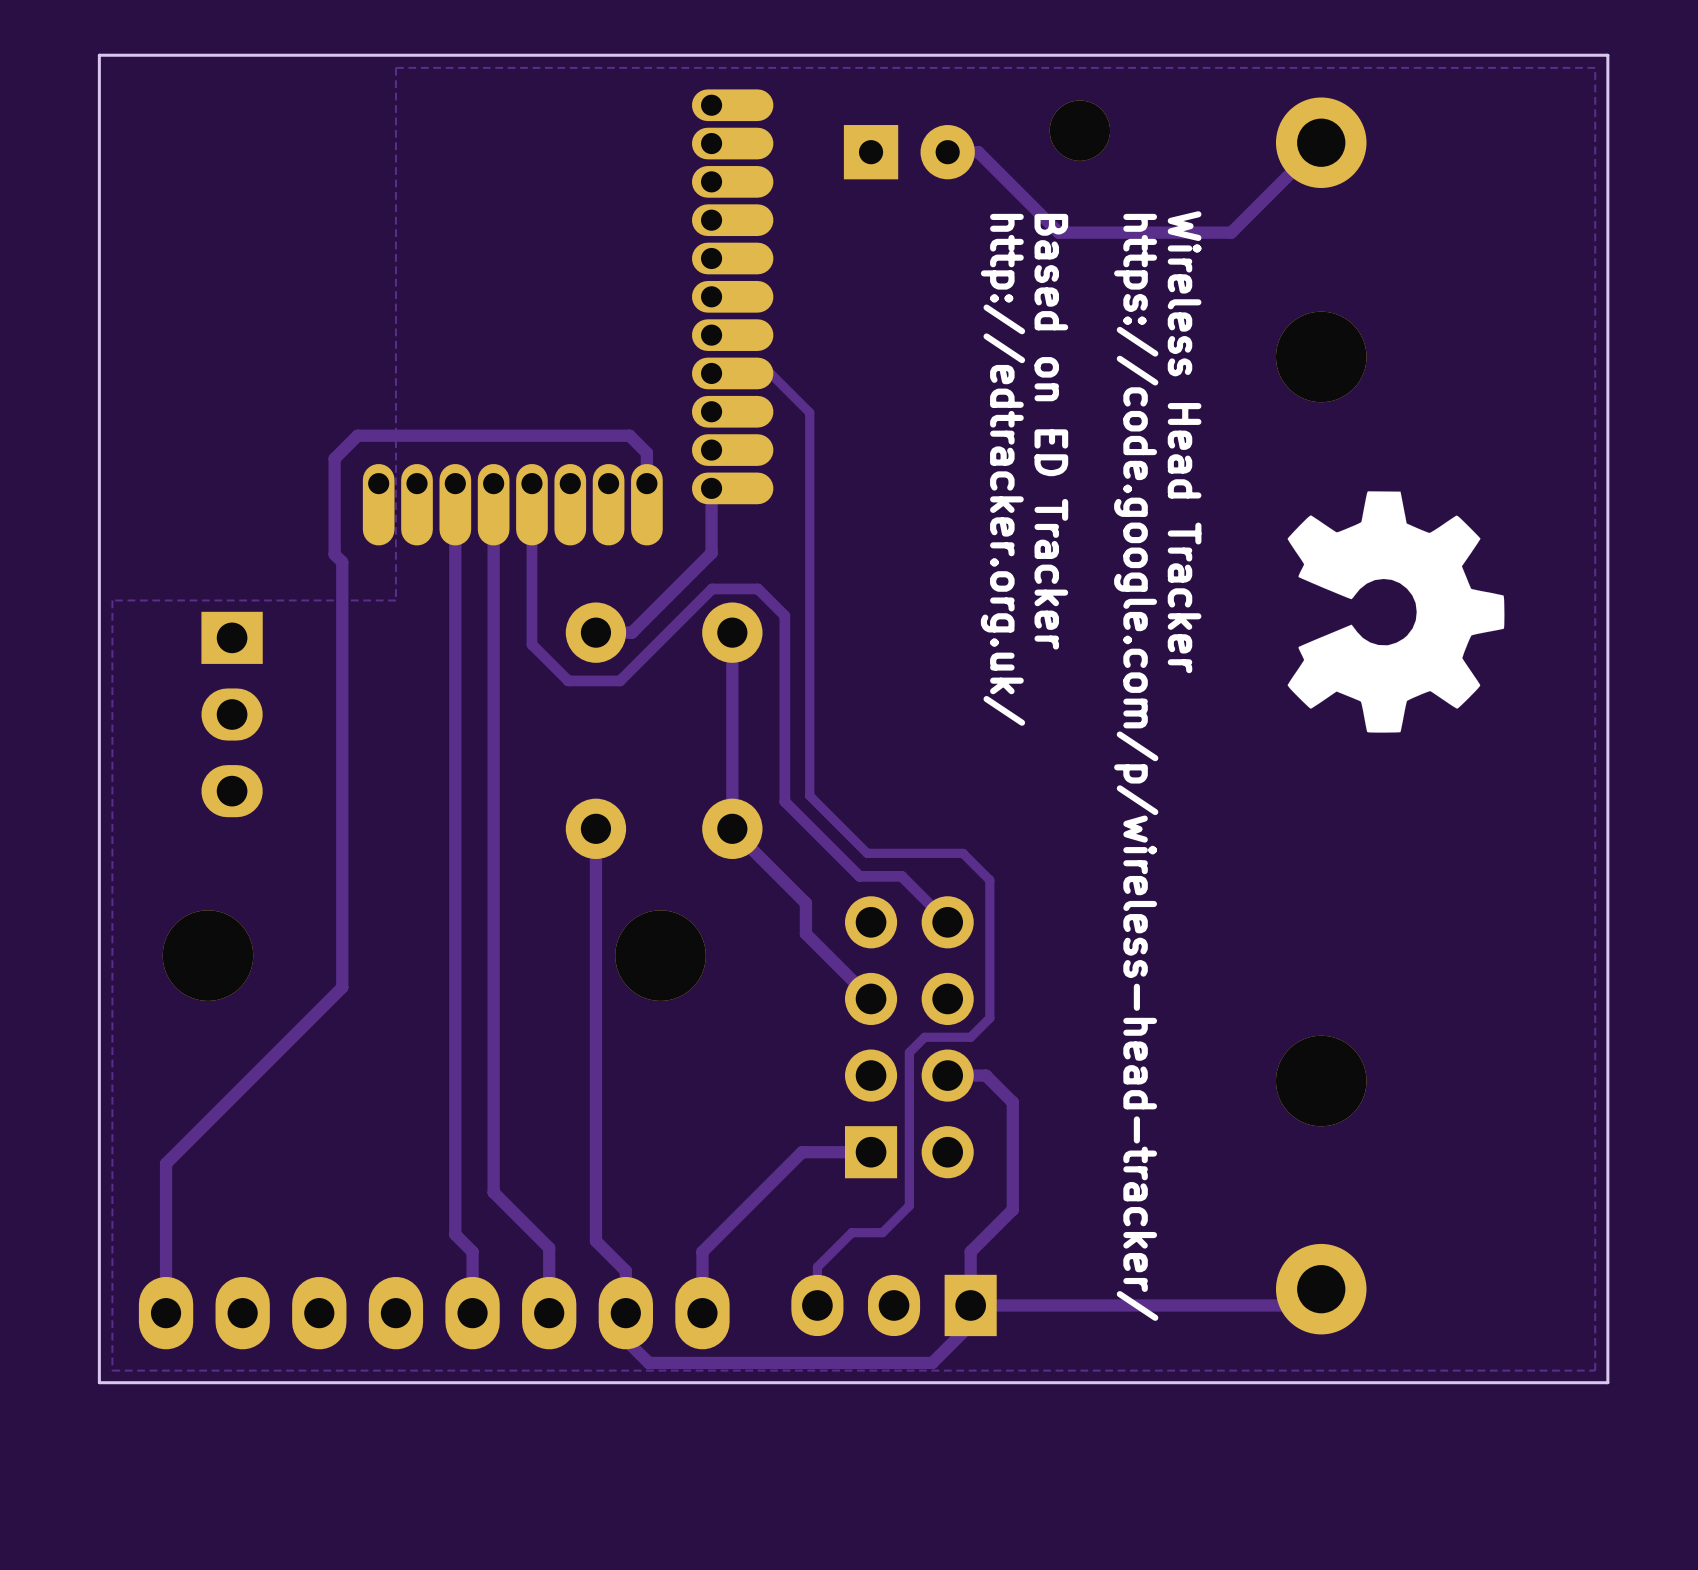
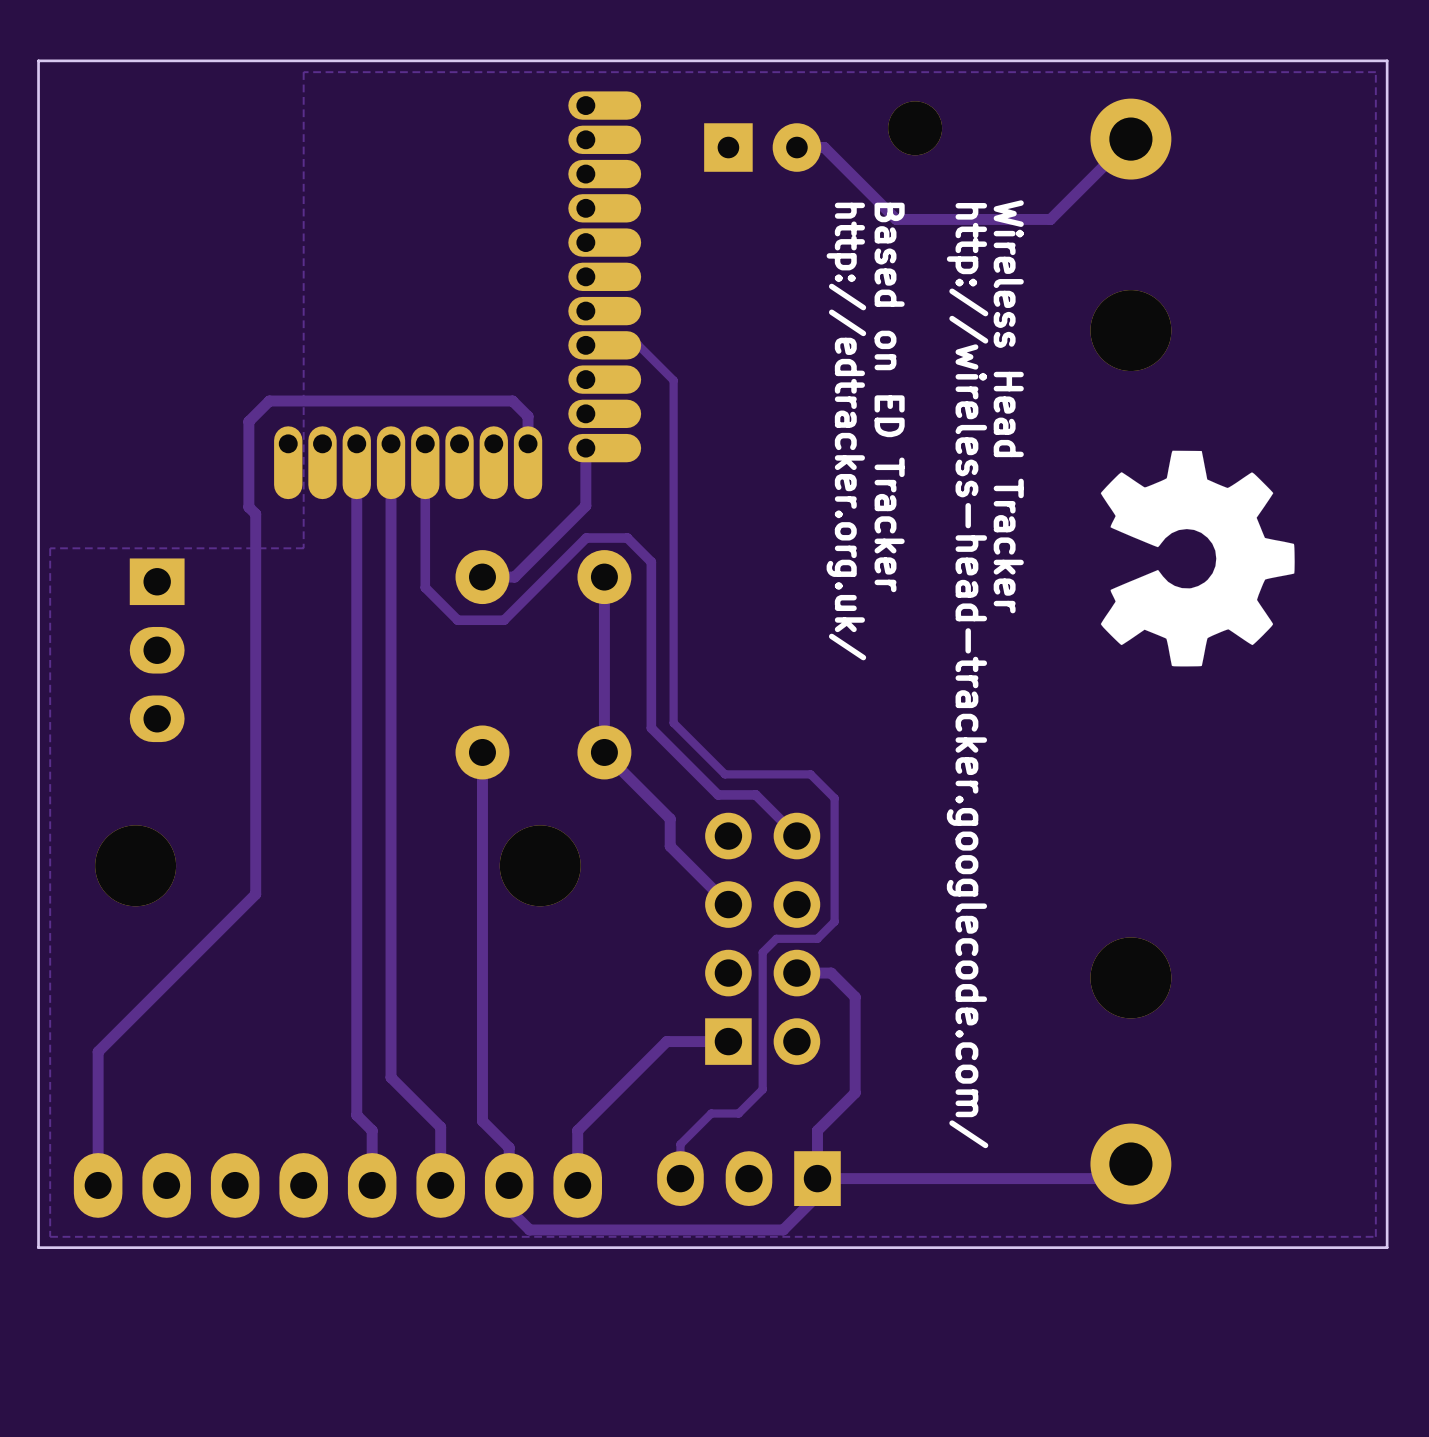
text: https://code.google.com/p/wireless-head-tracker/ (1136, 767) -> http://wireless-head-tracker.googlecode.com/ (967, 675)

